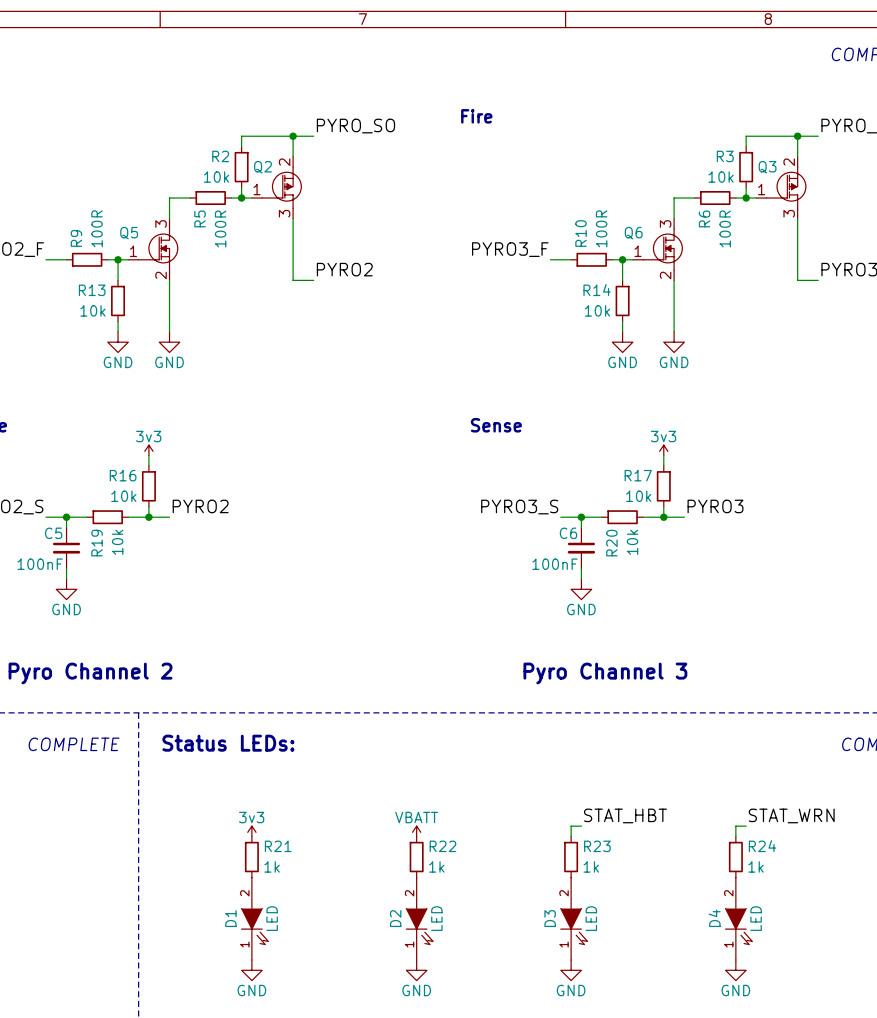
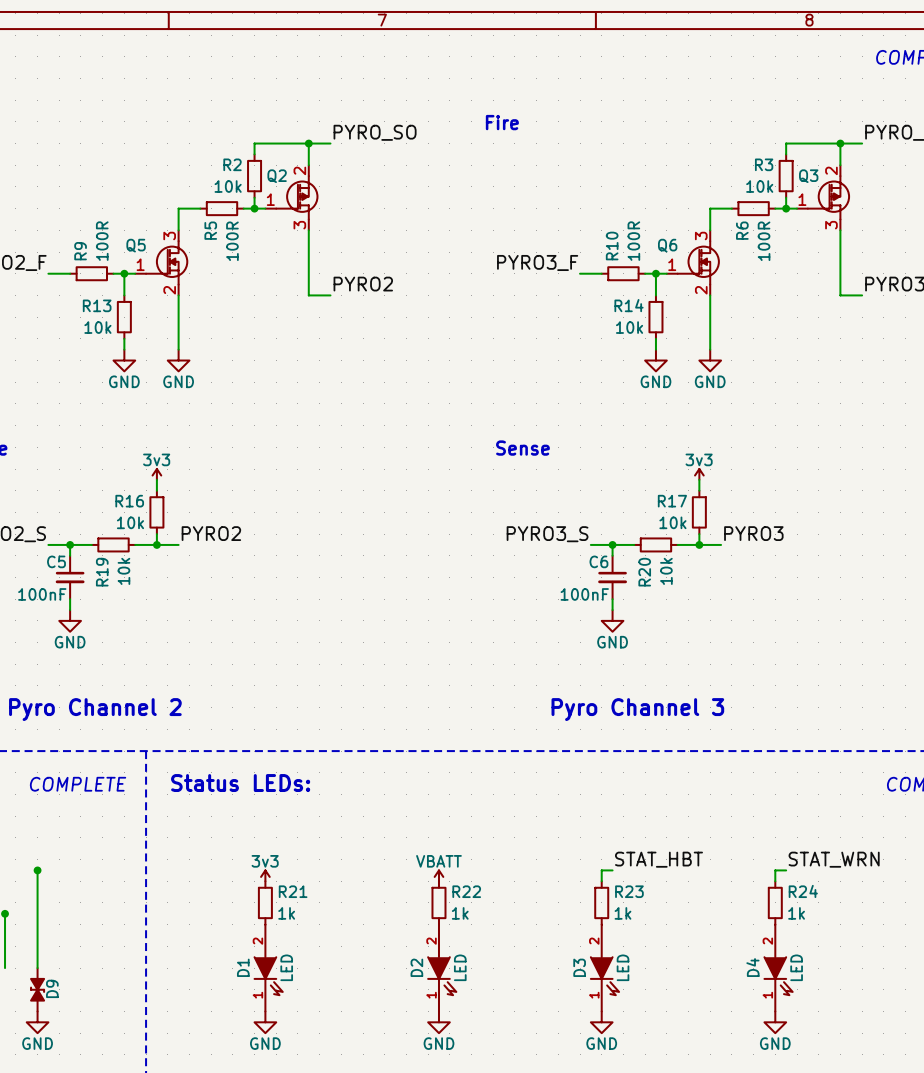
wire: none -> (37, 870) (37, 968)
junction: none -> (37, 870)
wire: none -> (5, 913) (5, 968)
junction: none -> (5, 913)
D9: none -> (37, 989)
power symbol: none -> GND (37, 1022)

